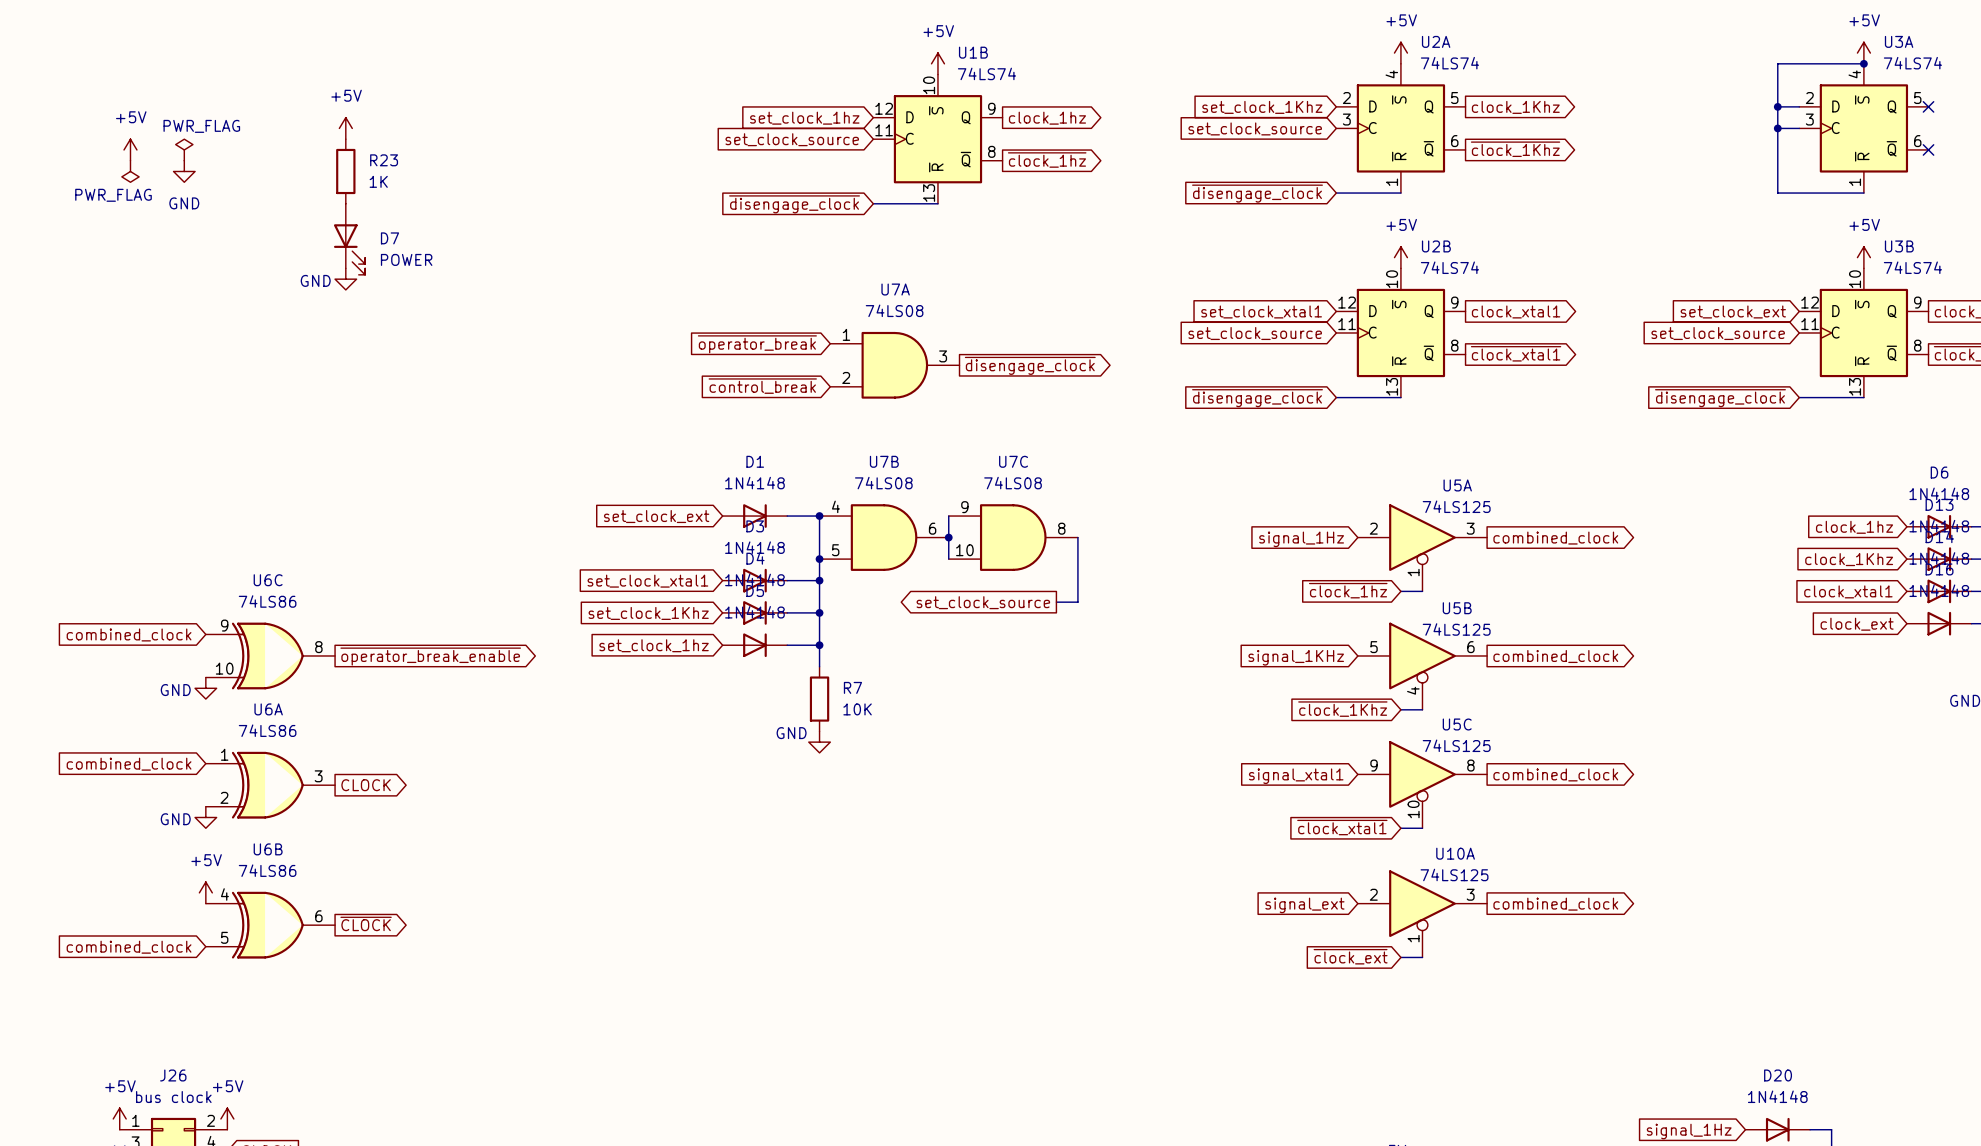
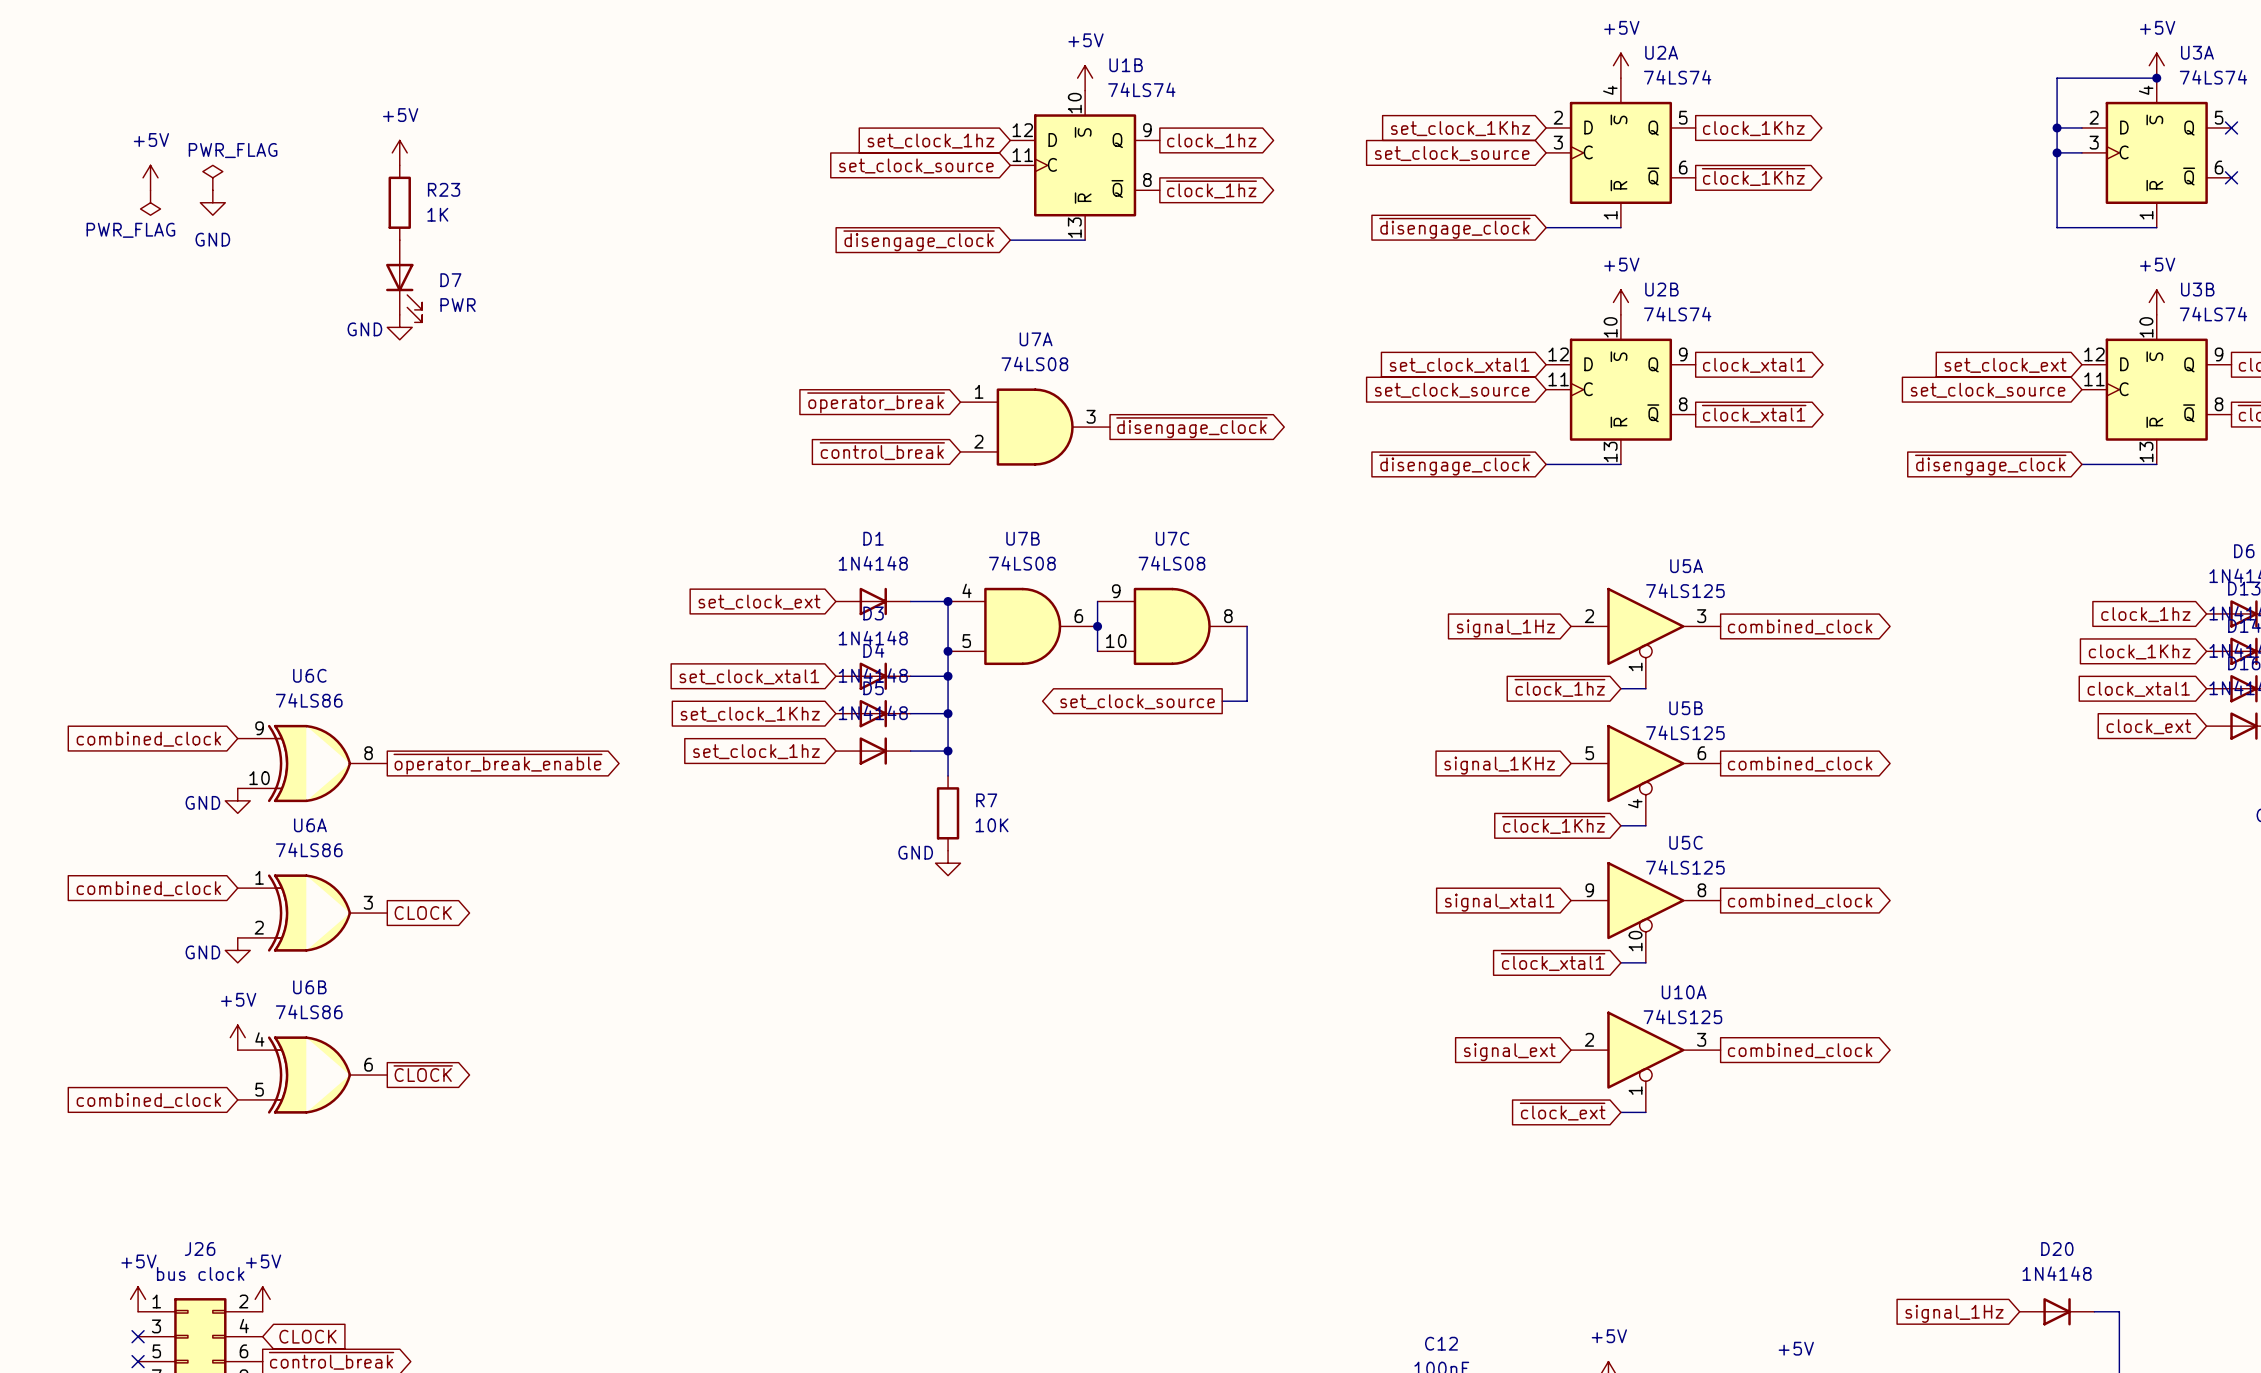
D7 value: POWER (406, 259) -> PWR (458, 305)

